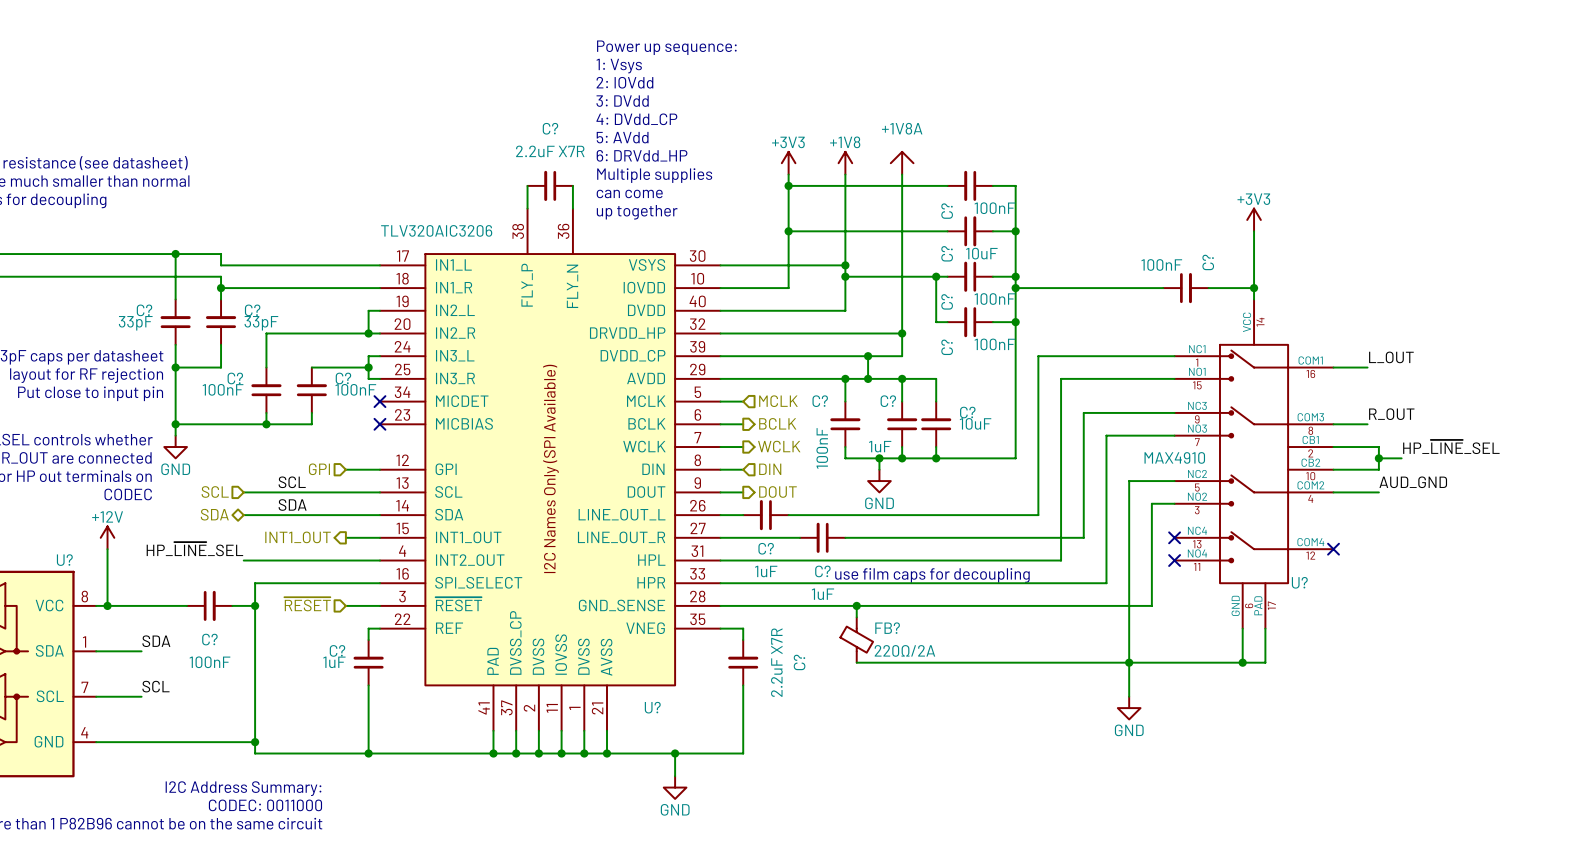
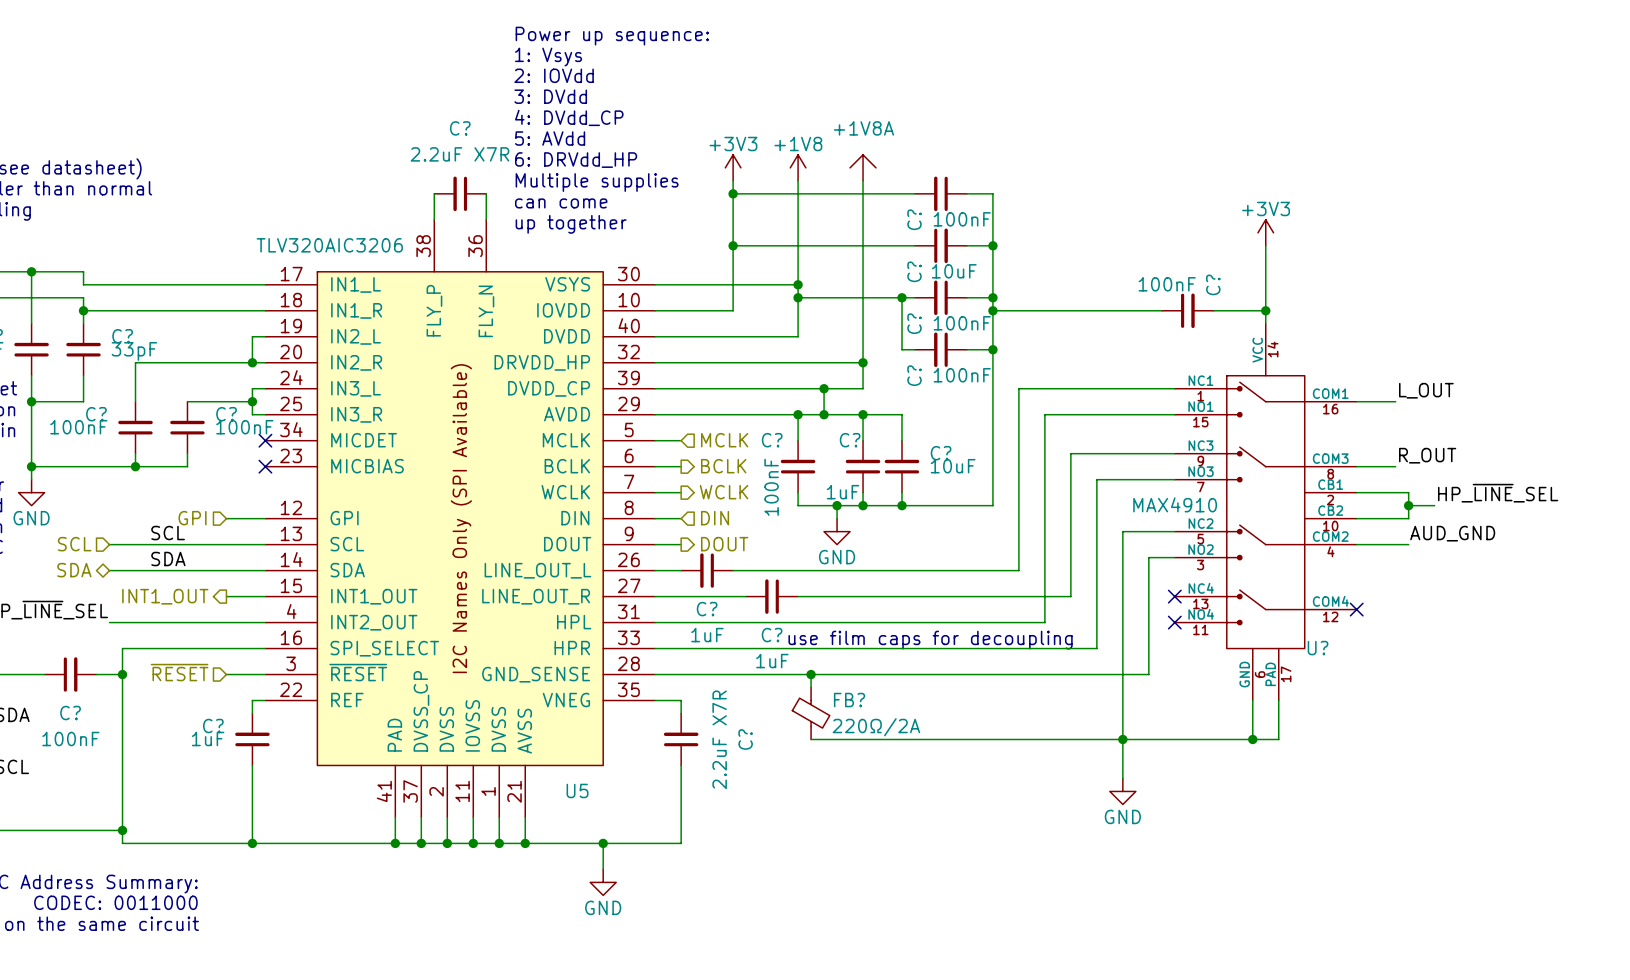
U? name: U? (652, 707) -> U5 (577, 790)

